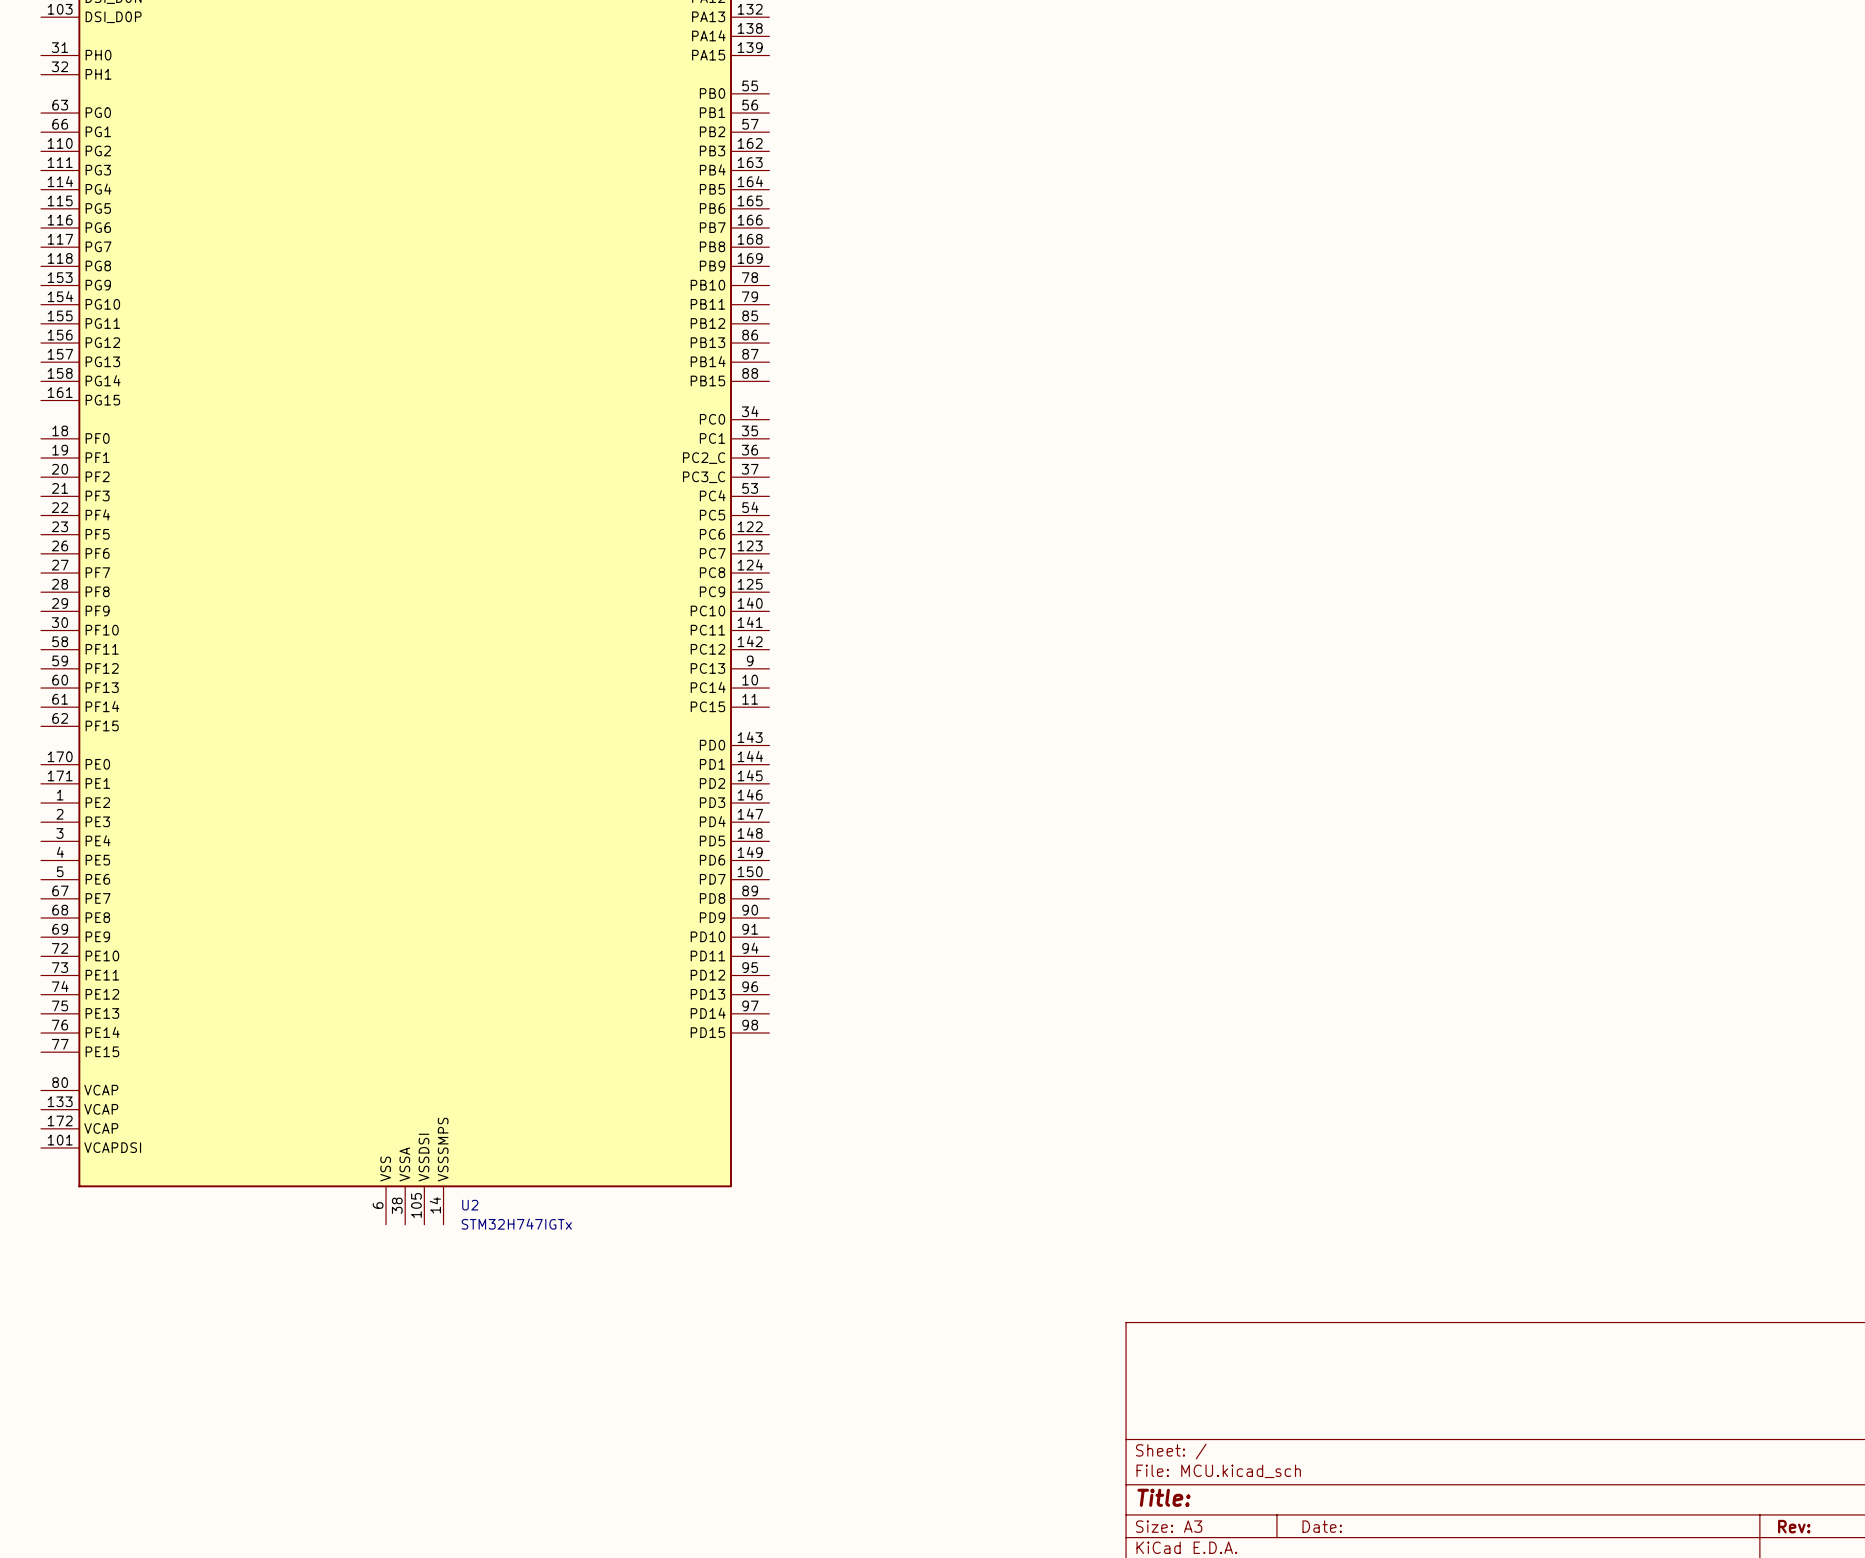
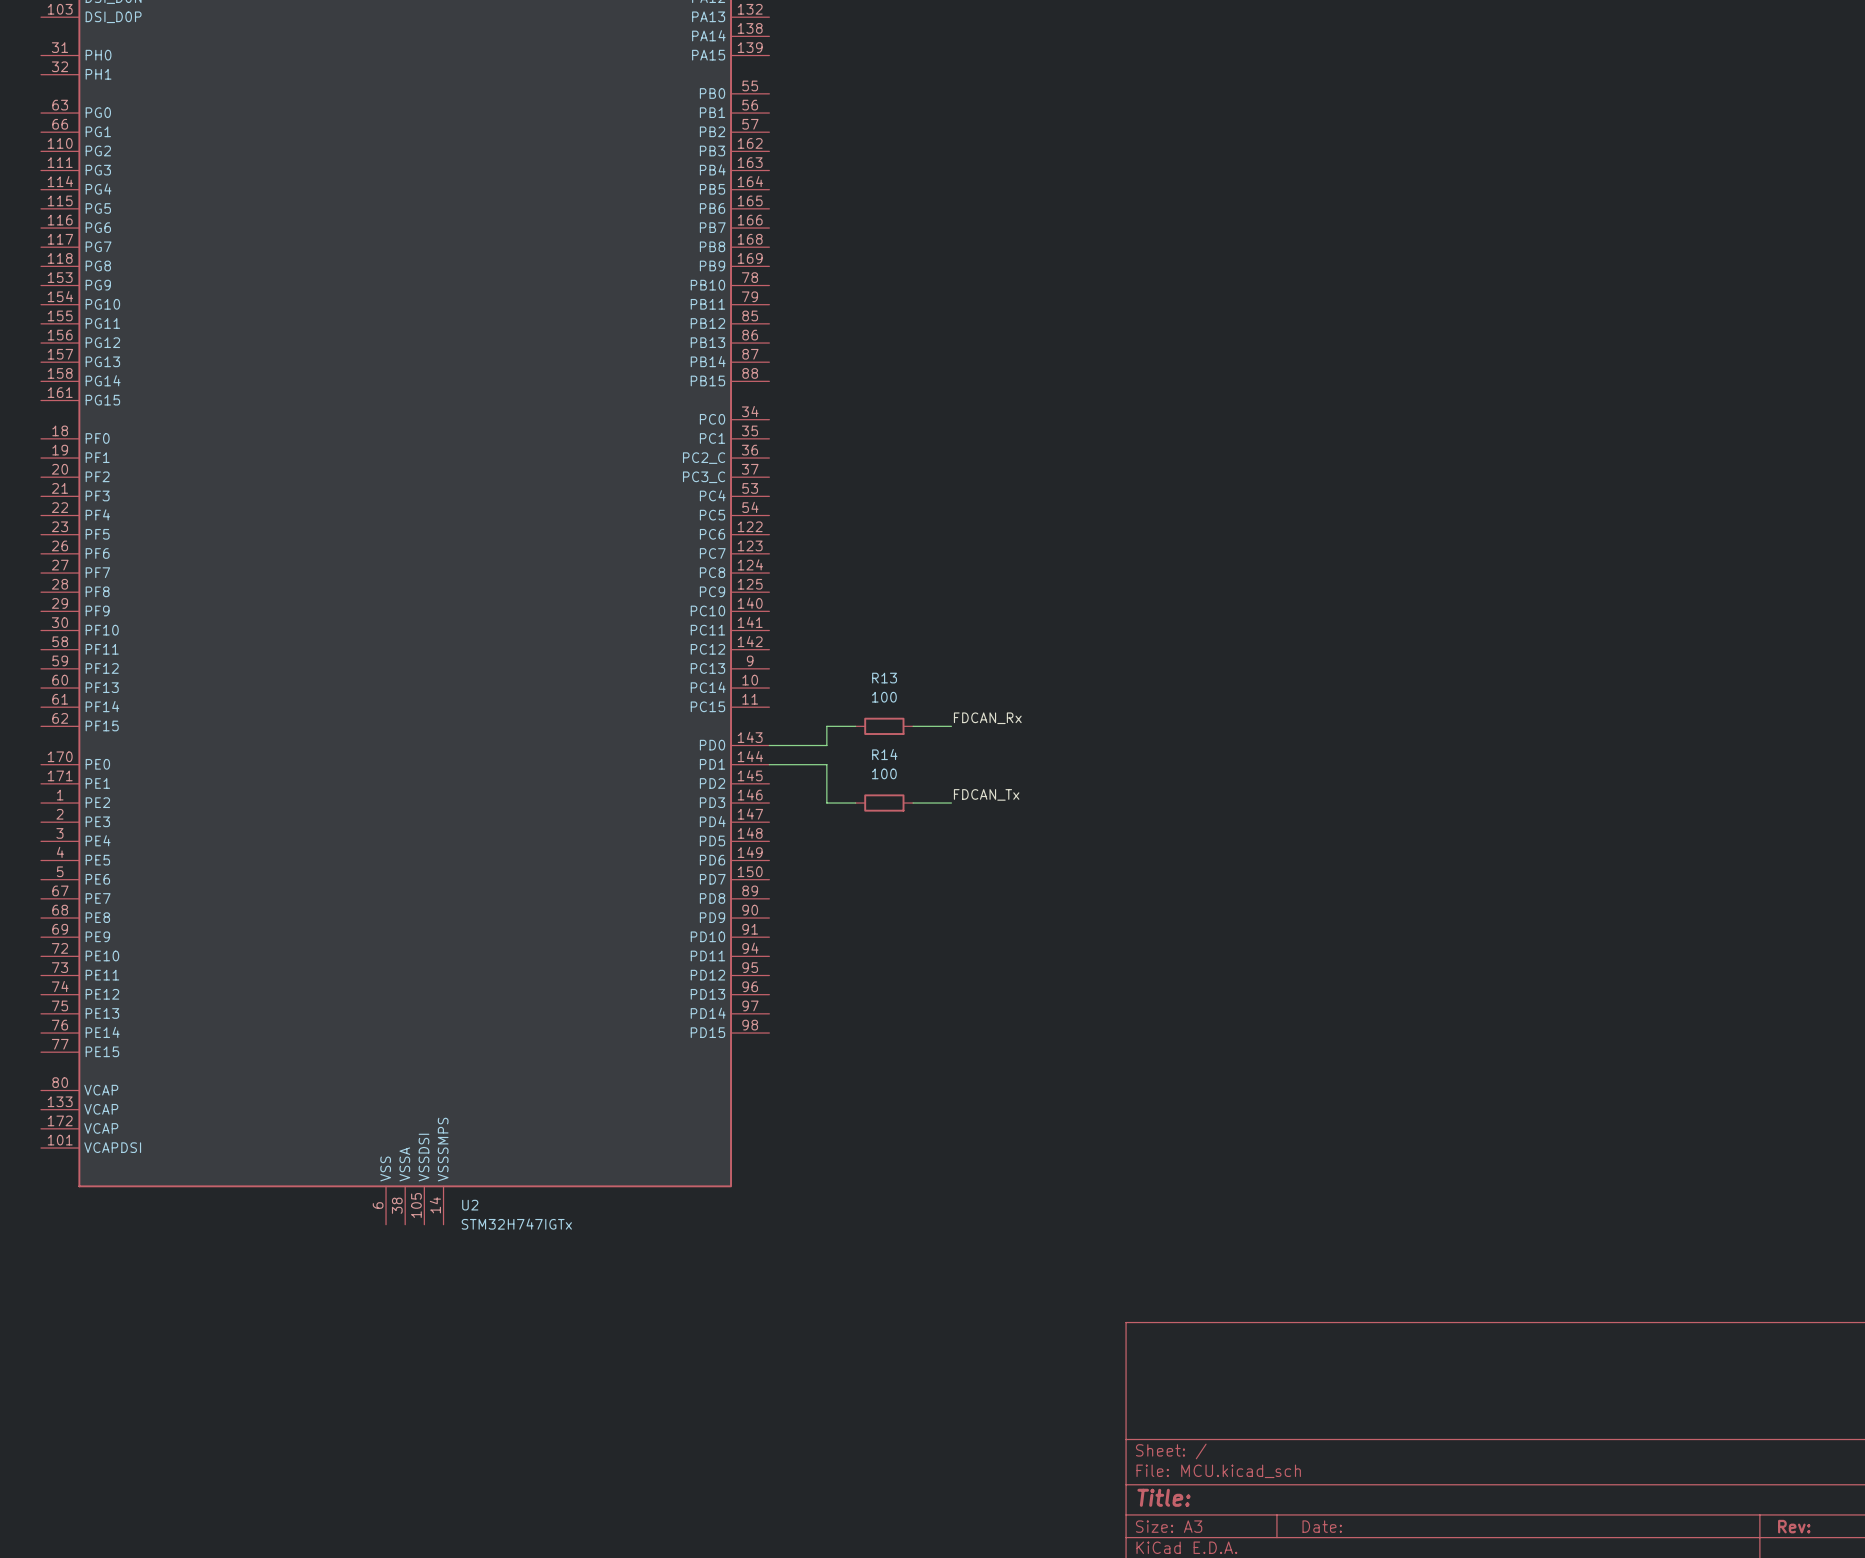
label: none -> FDCAN_Rx (987, 718)
wire: none -> (855, 726) (826, 726) (826, 745) (769, 745)
R13: none -> 100 (884, 726)
wire: none -> (913, 726) (951, 726)
wire: none -> (769, 764) (826, 764) (826, 803) (855, 803)
label: none -> FDCAN_Tx (986, 794)
R14: none -> 100 (884, 803)
wire: none -> (913, 803) (951, 803)

